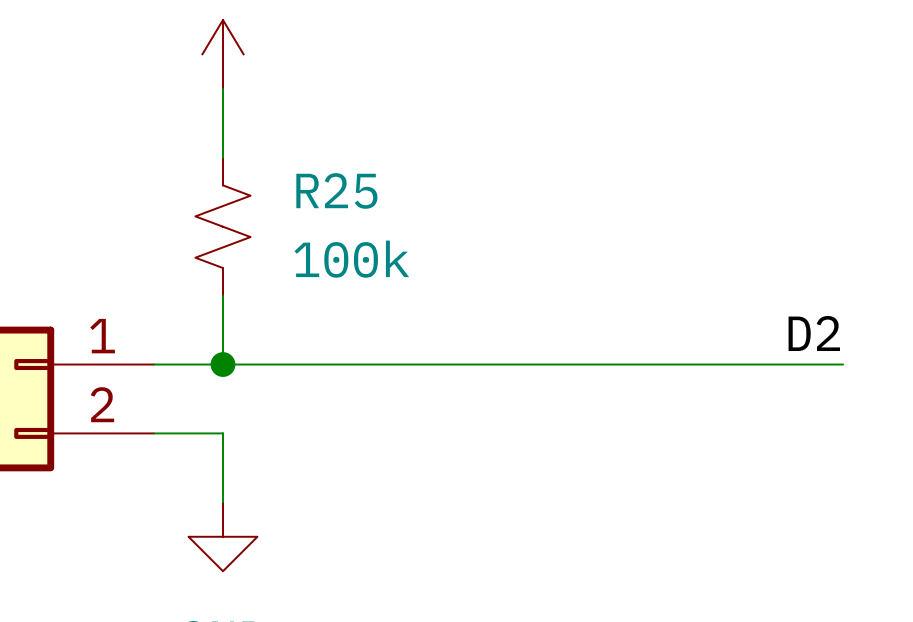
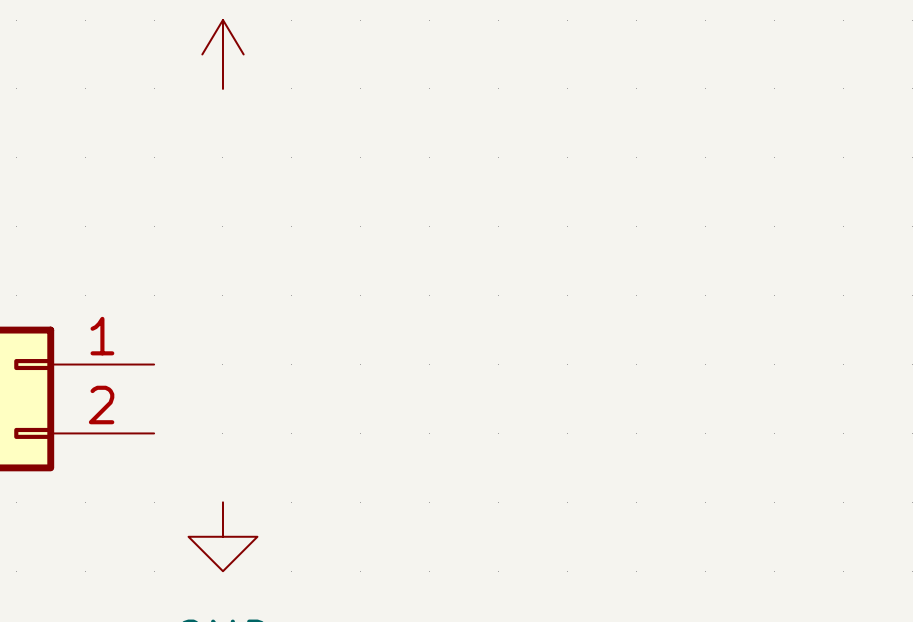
wire: (222, 88) (222, 157) -> none
R25: 100k (222, 226) -> none
wire: (222, 295) (222, 364) -> none
label: D2 (814, 333) -> none
wire: (154, 364) (843, 364) -> none
junction: (222, 364) -> none
wire: (154, 433) (222, 433) (222, 502) -> none

